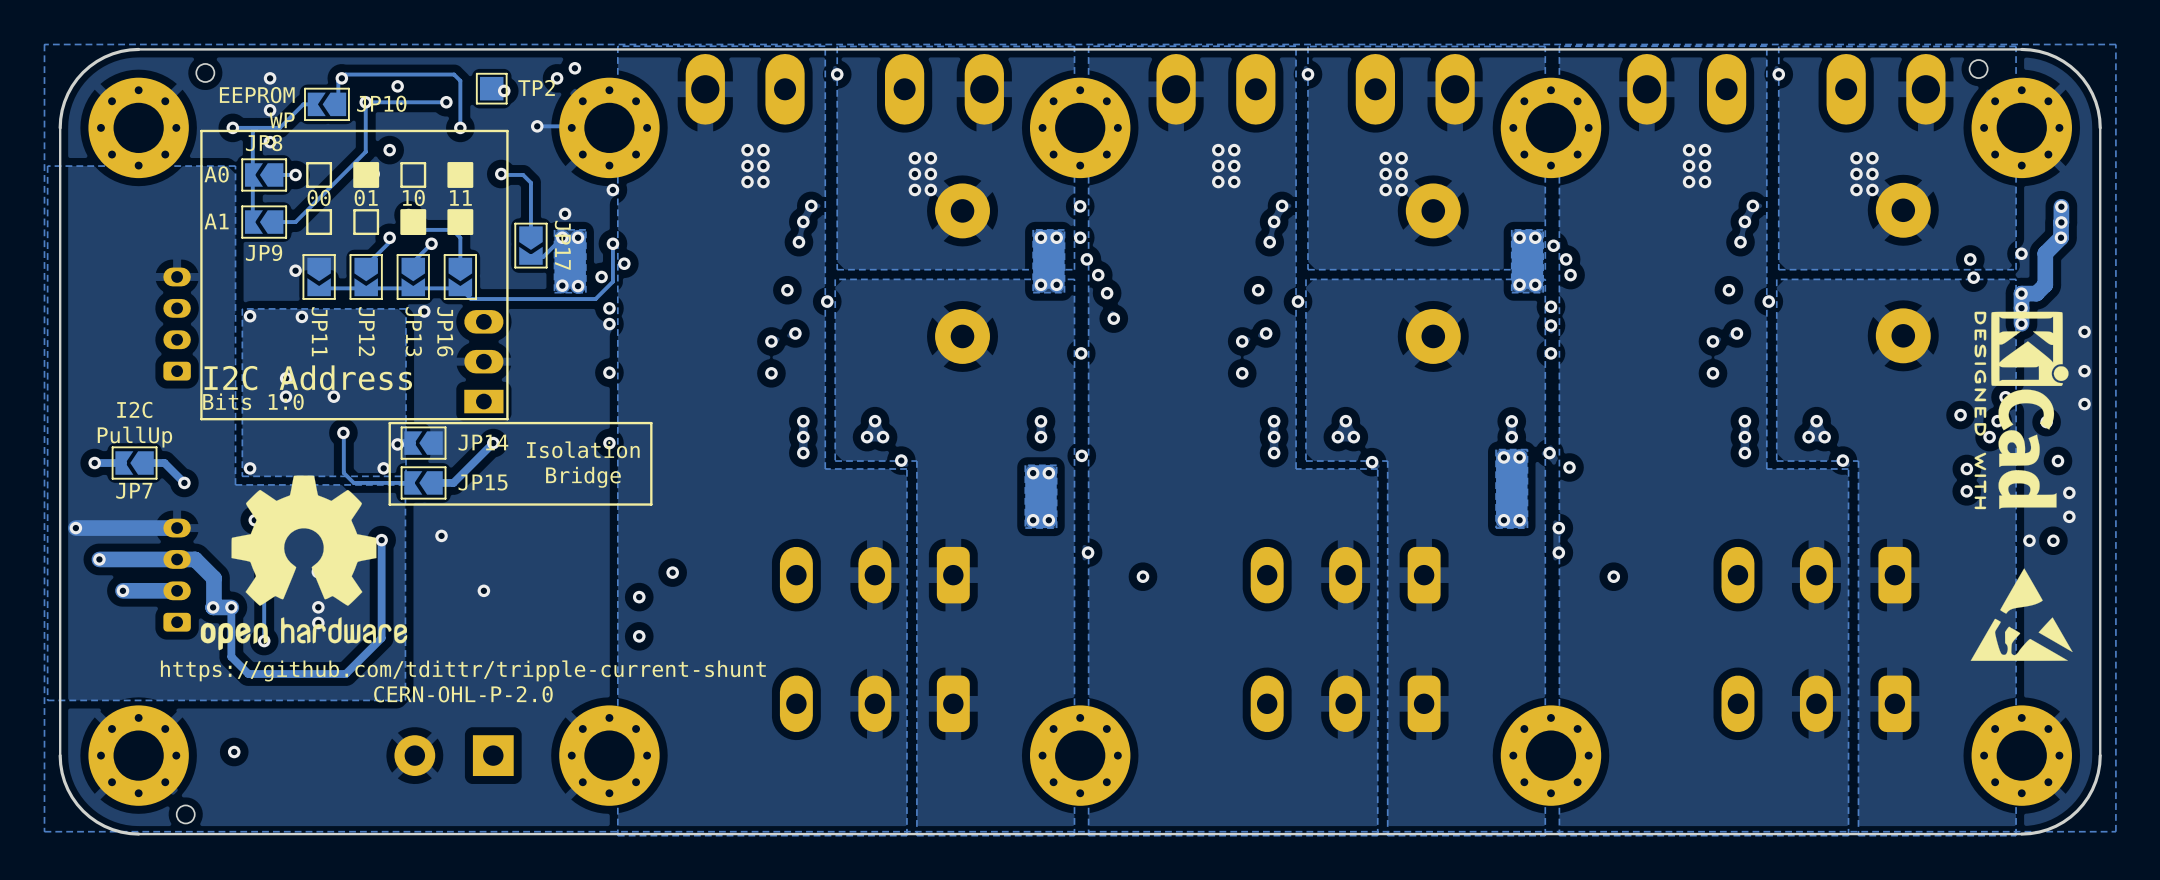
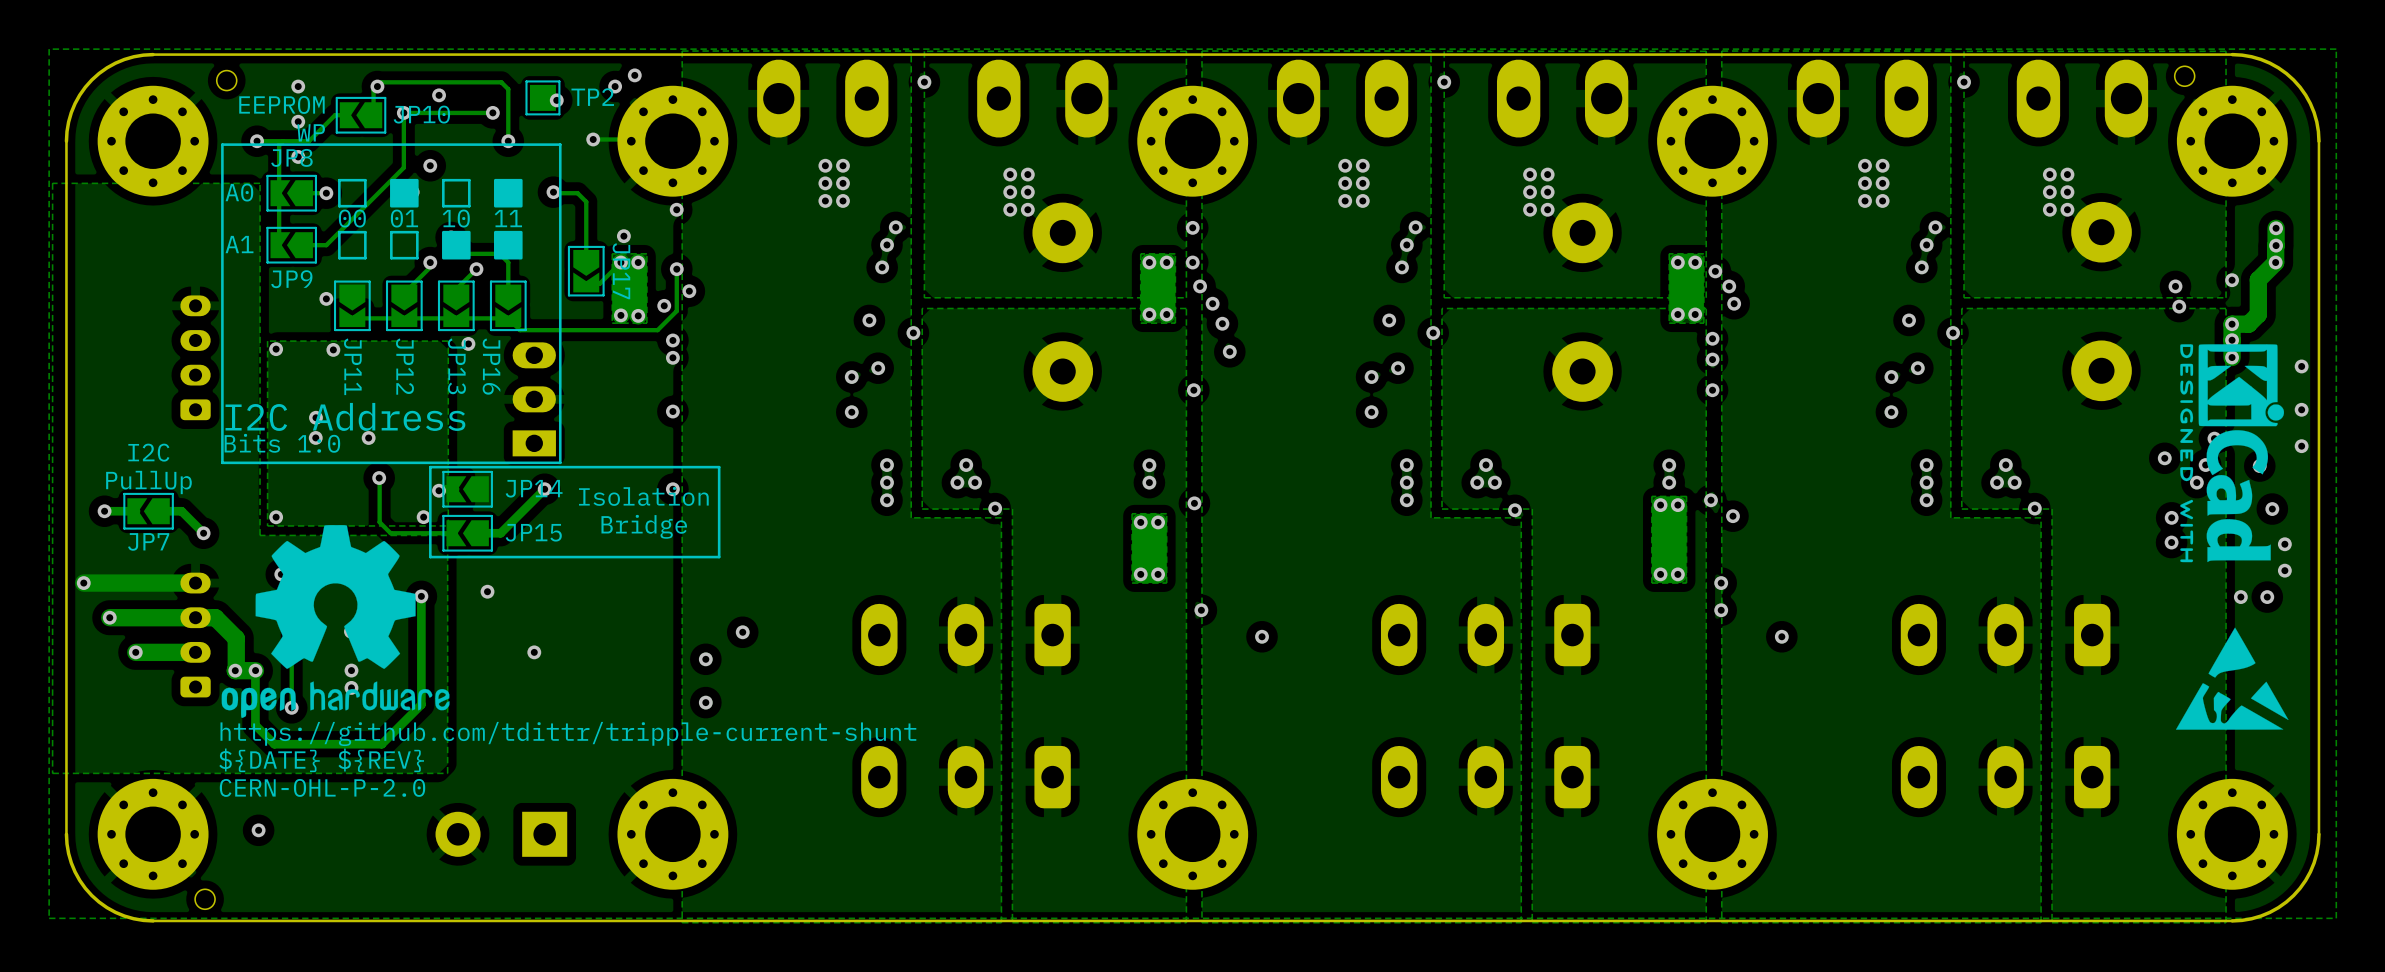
text position: https://github.com/tdittr/tripple-current-shunt (463, 670) -> https://github.com/tdittr/tripple-current-shunt (568, 733)
text: none -> ${DATE} ${REV} (321, 760)
text position: CERN-OHL-P-2.0 (463, 694) -> CERN-OHL-P-2.0 (322, 787)

